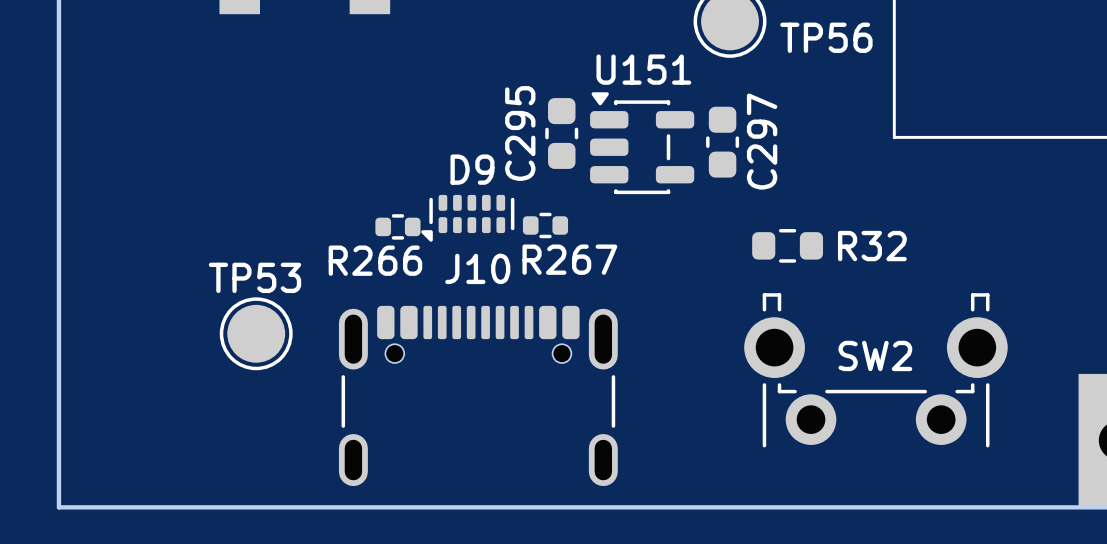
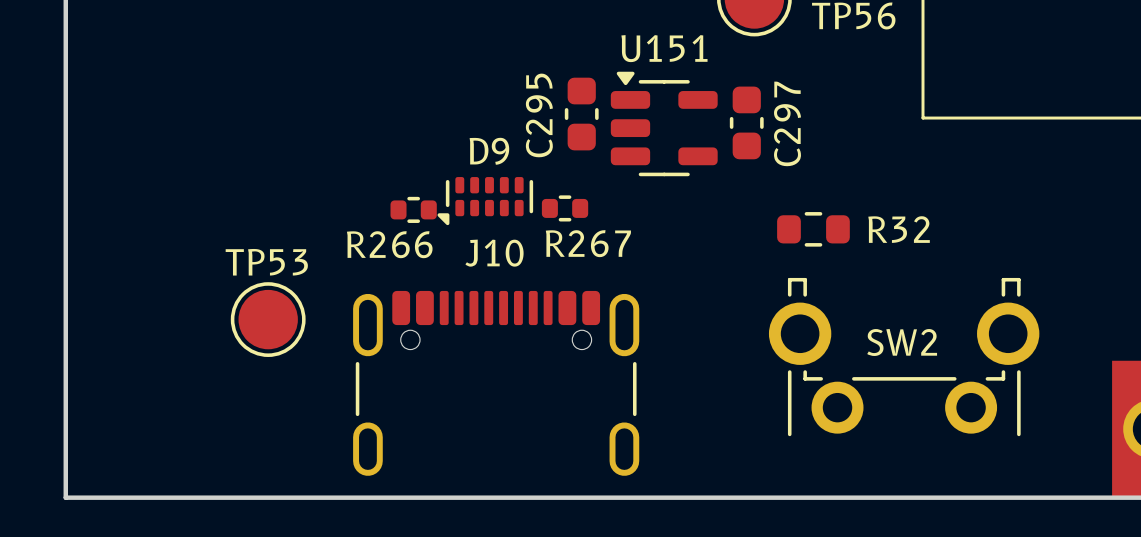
U151 footprint: [590, 92, 695, 195] -> [610, 71, 718, 177]

